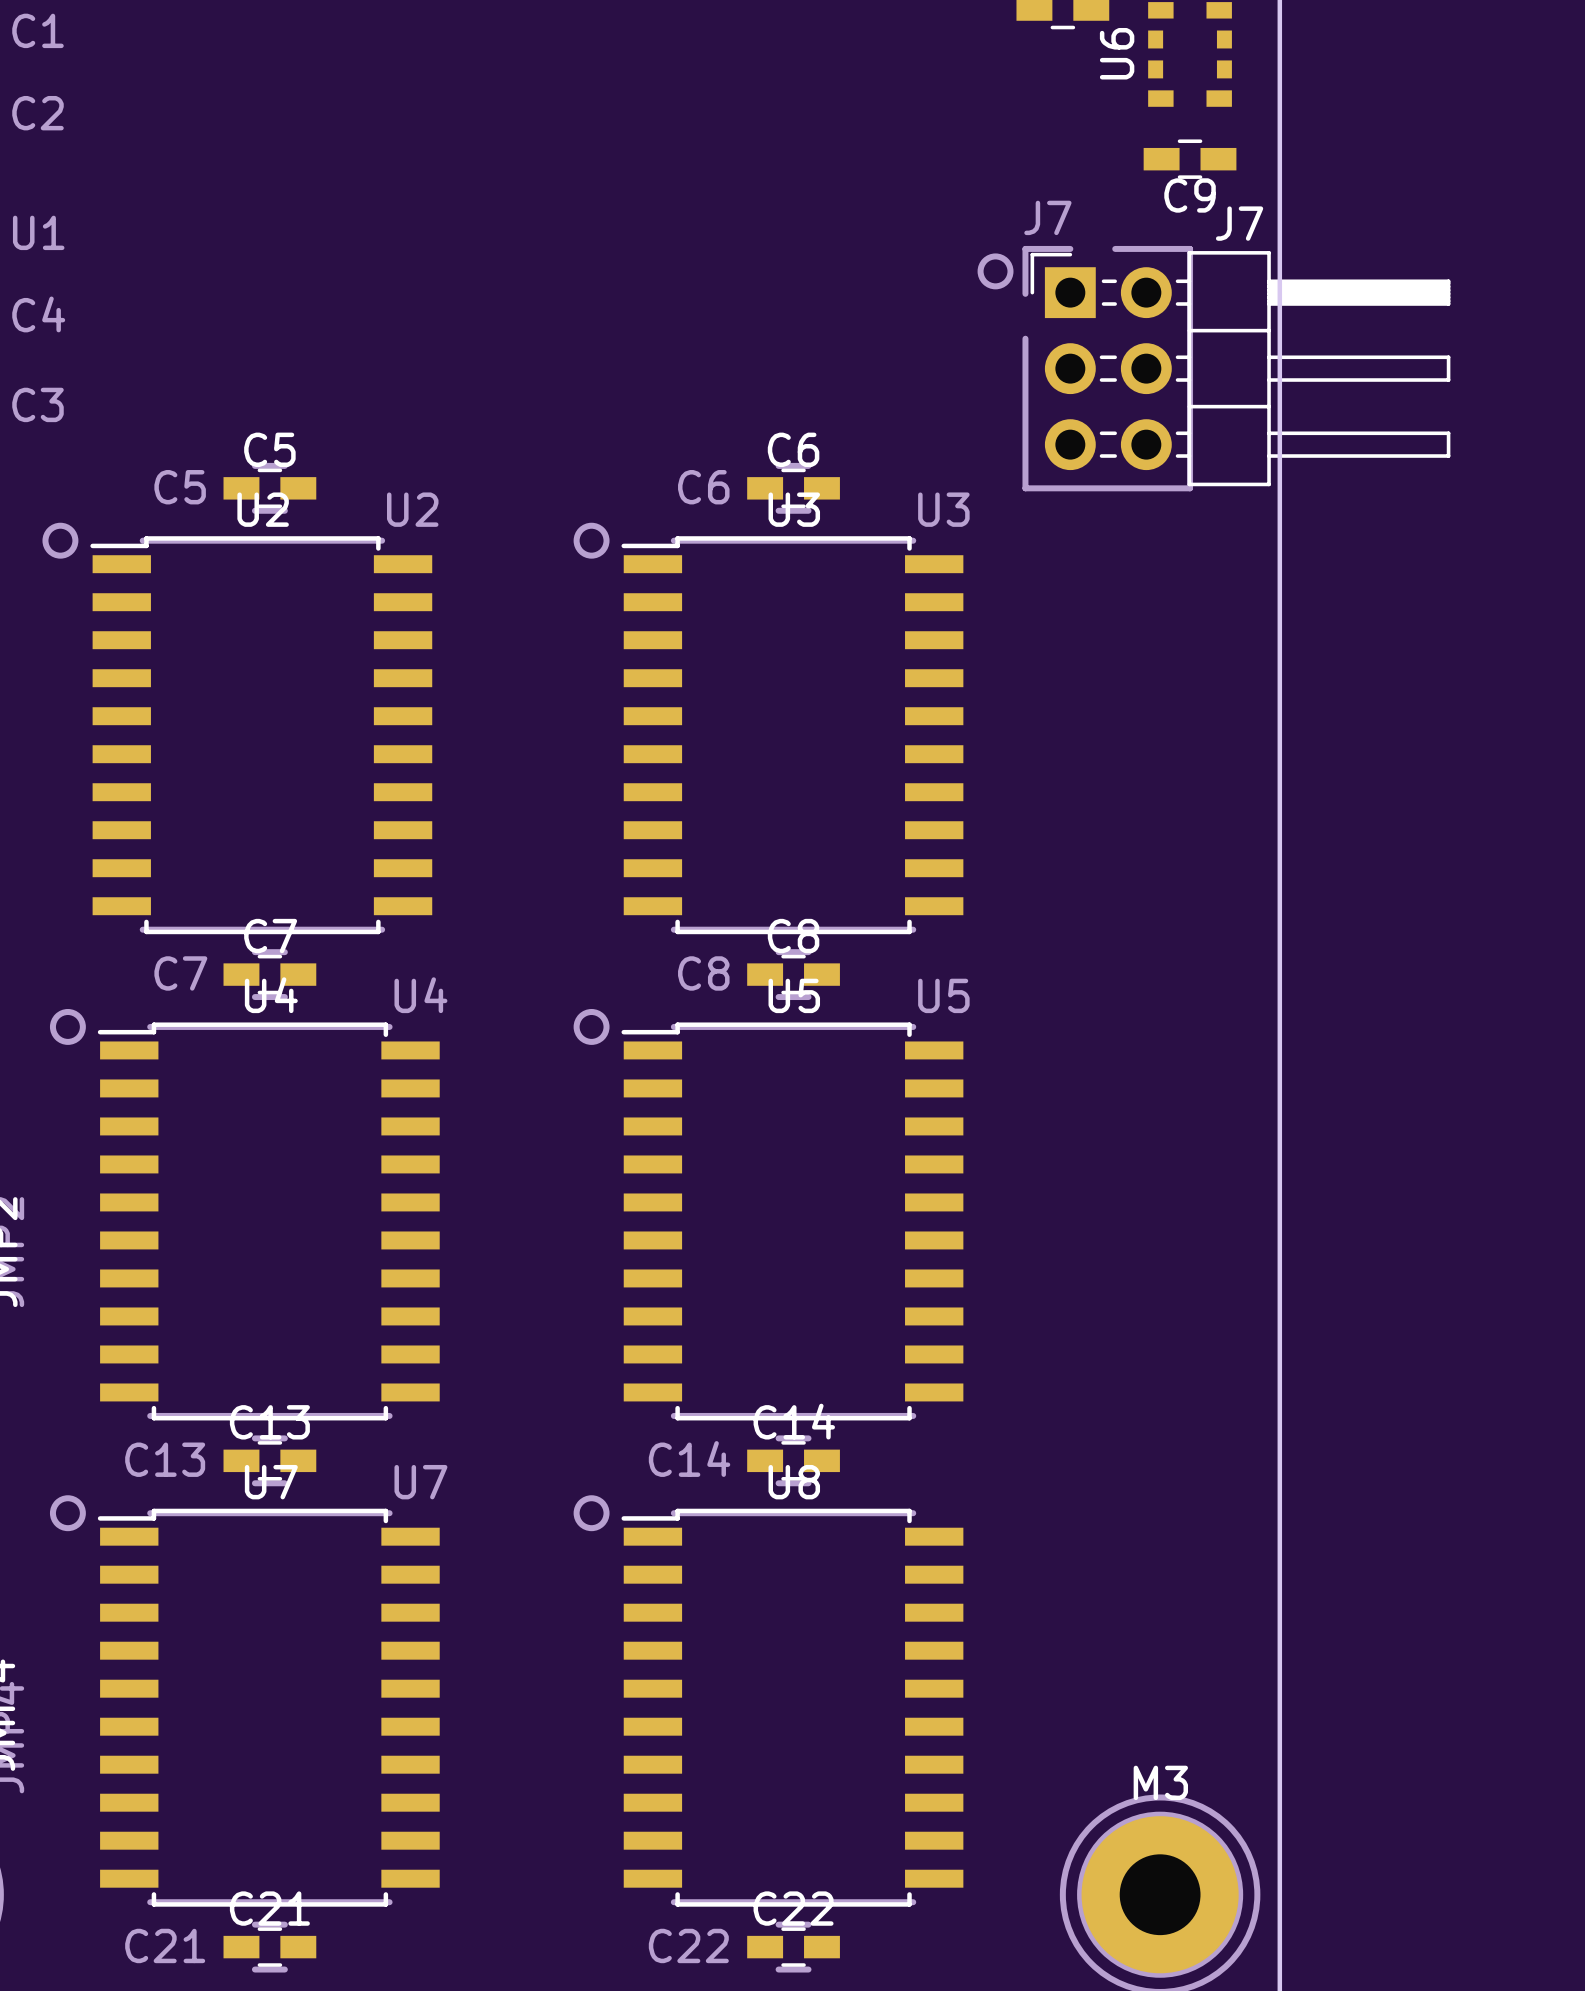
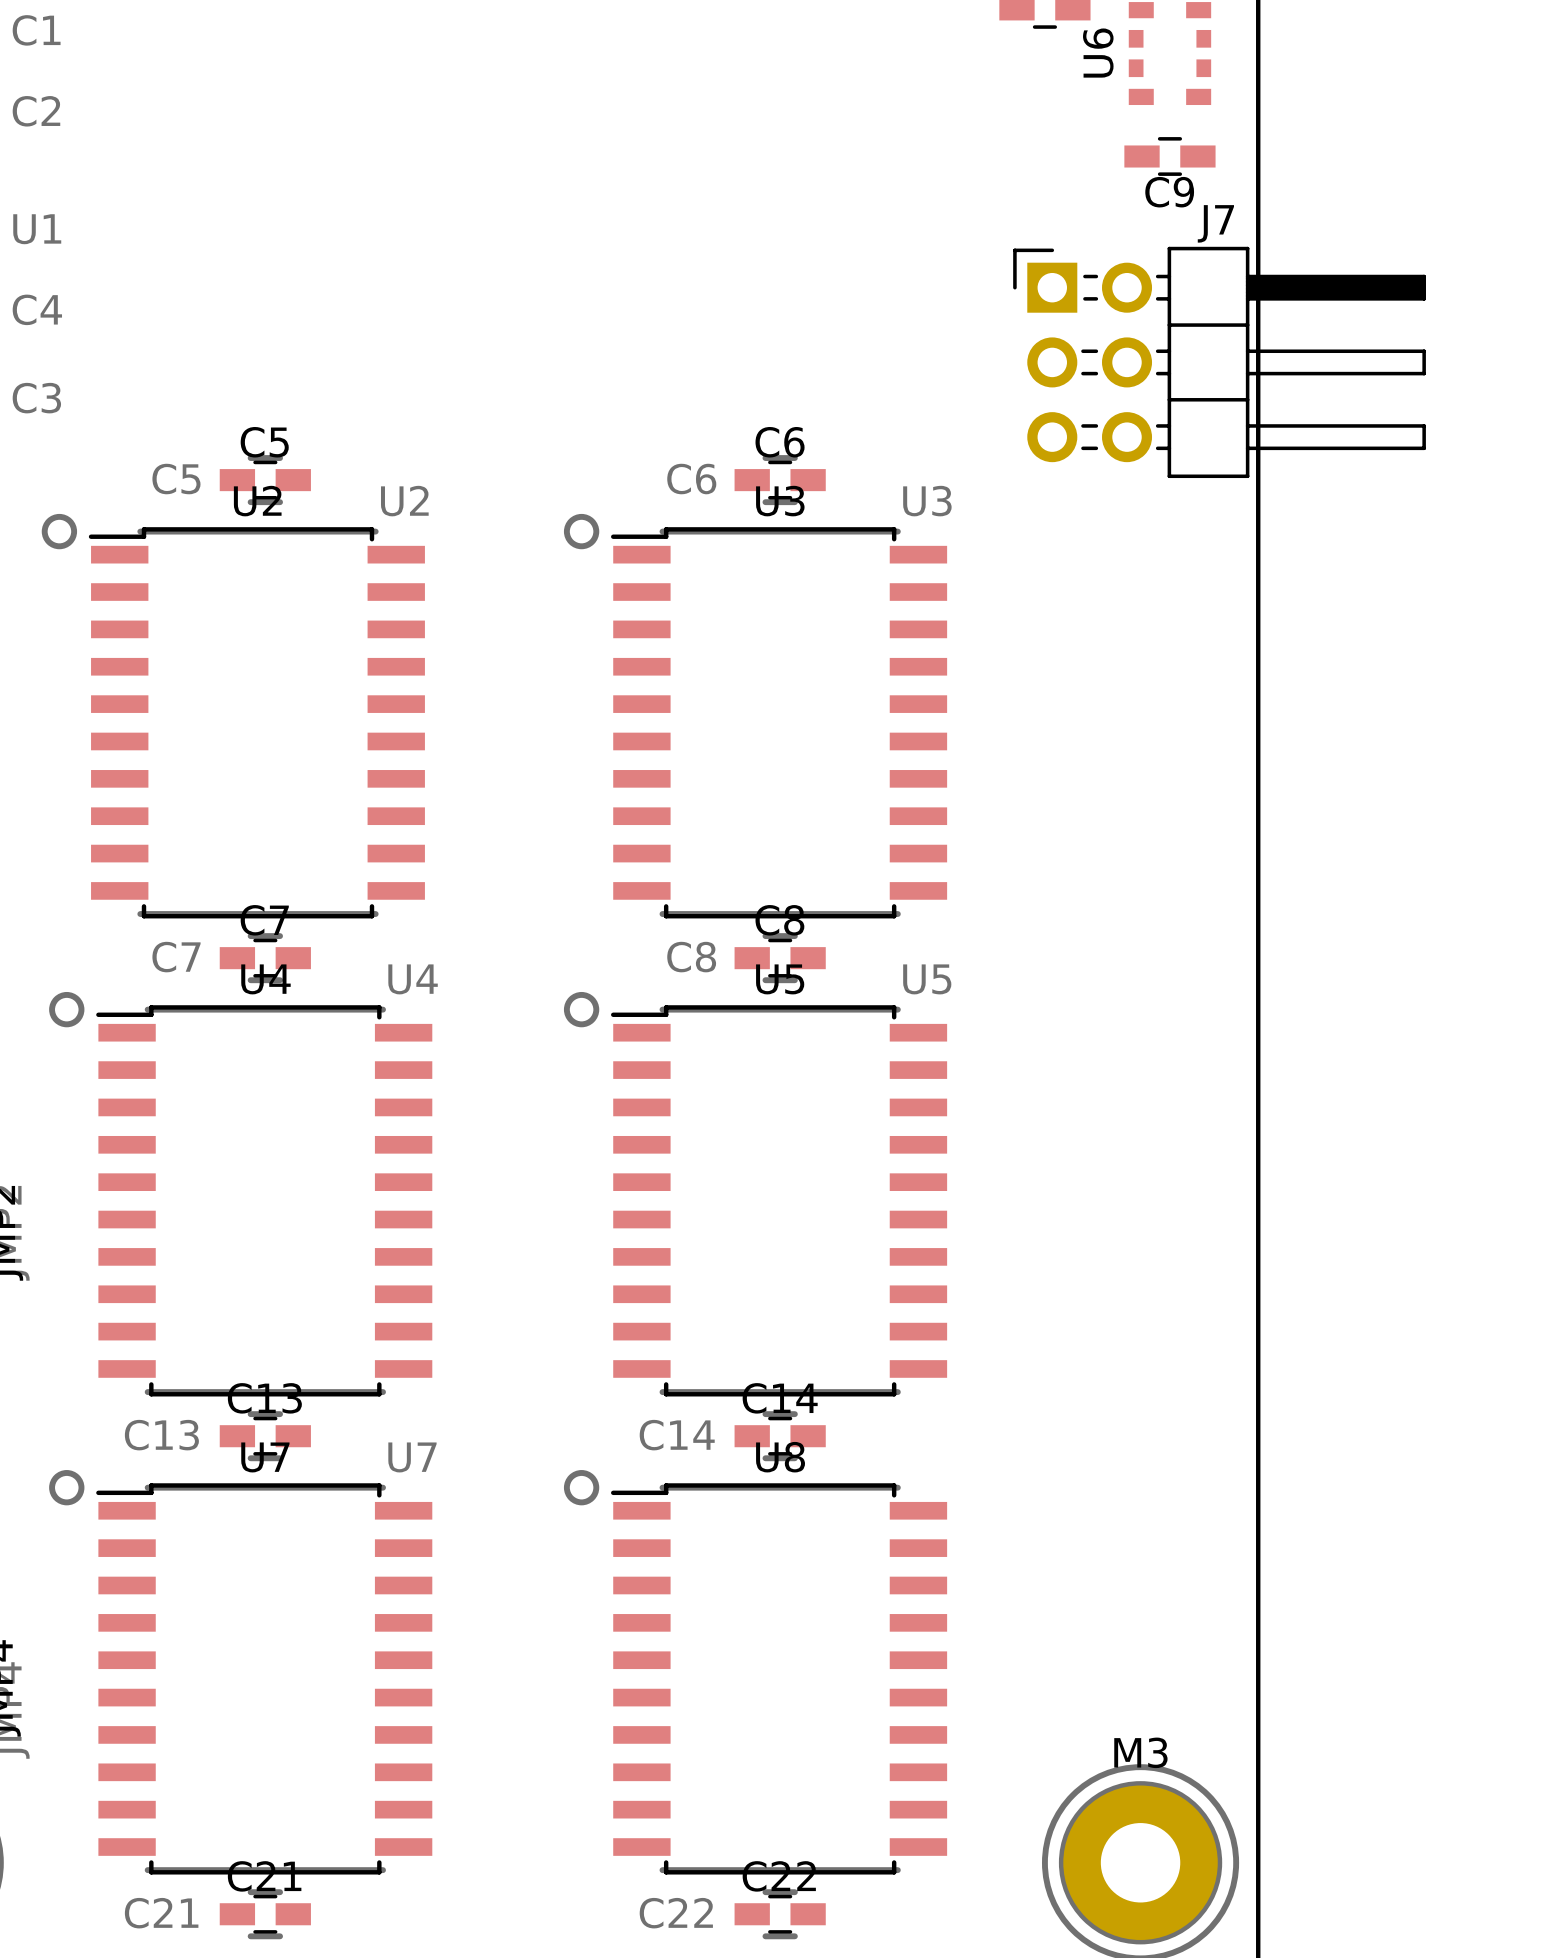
text: J7 (1047, 217) -> none
line: (1070, 248) (1025, 248) (1025, 293) -> none
line: (1115, 248) (1190, 248) (1190, 488) (1025, 488) (1025, 338) -> none
drawing: [977, 253, 1014, 290] -> none

